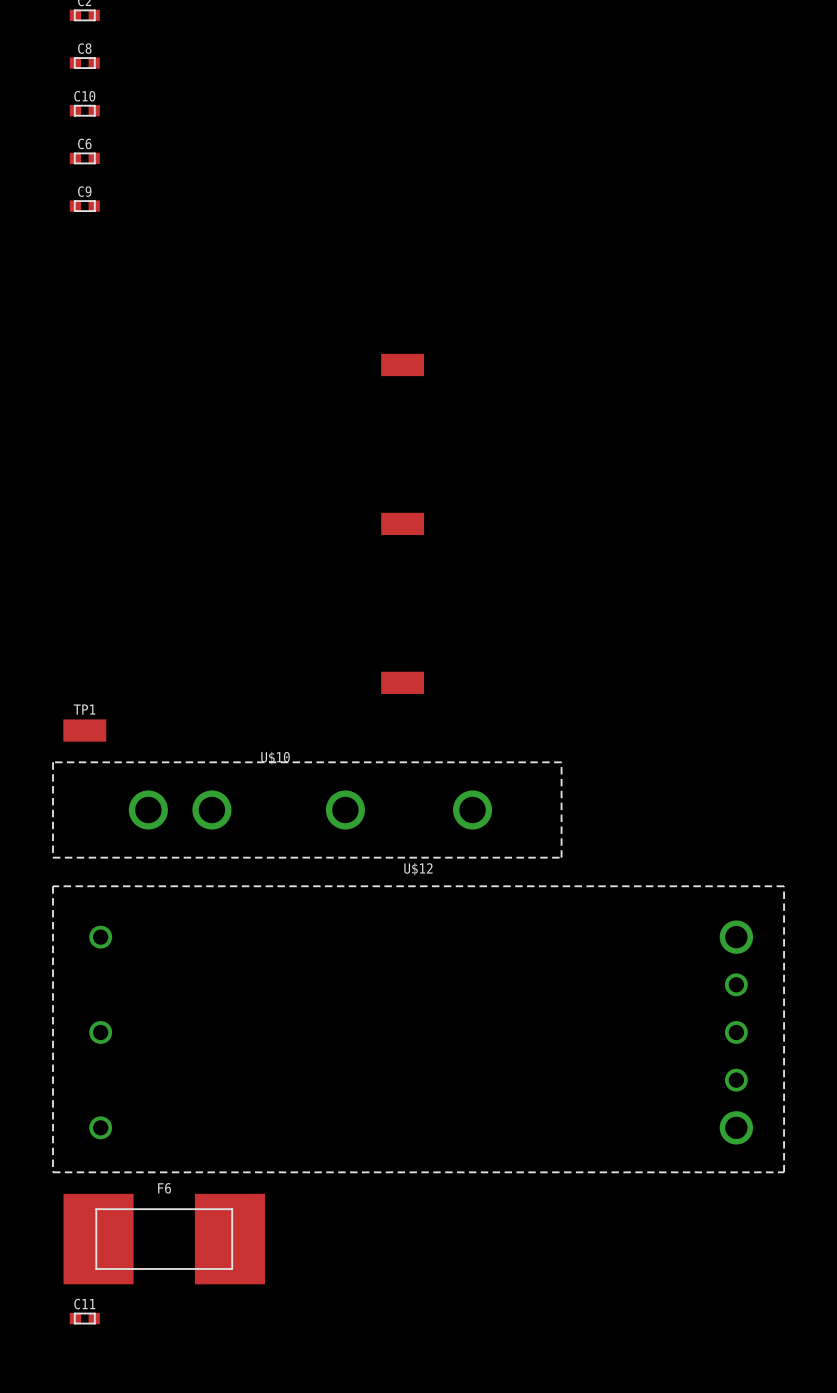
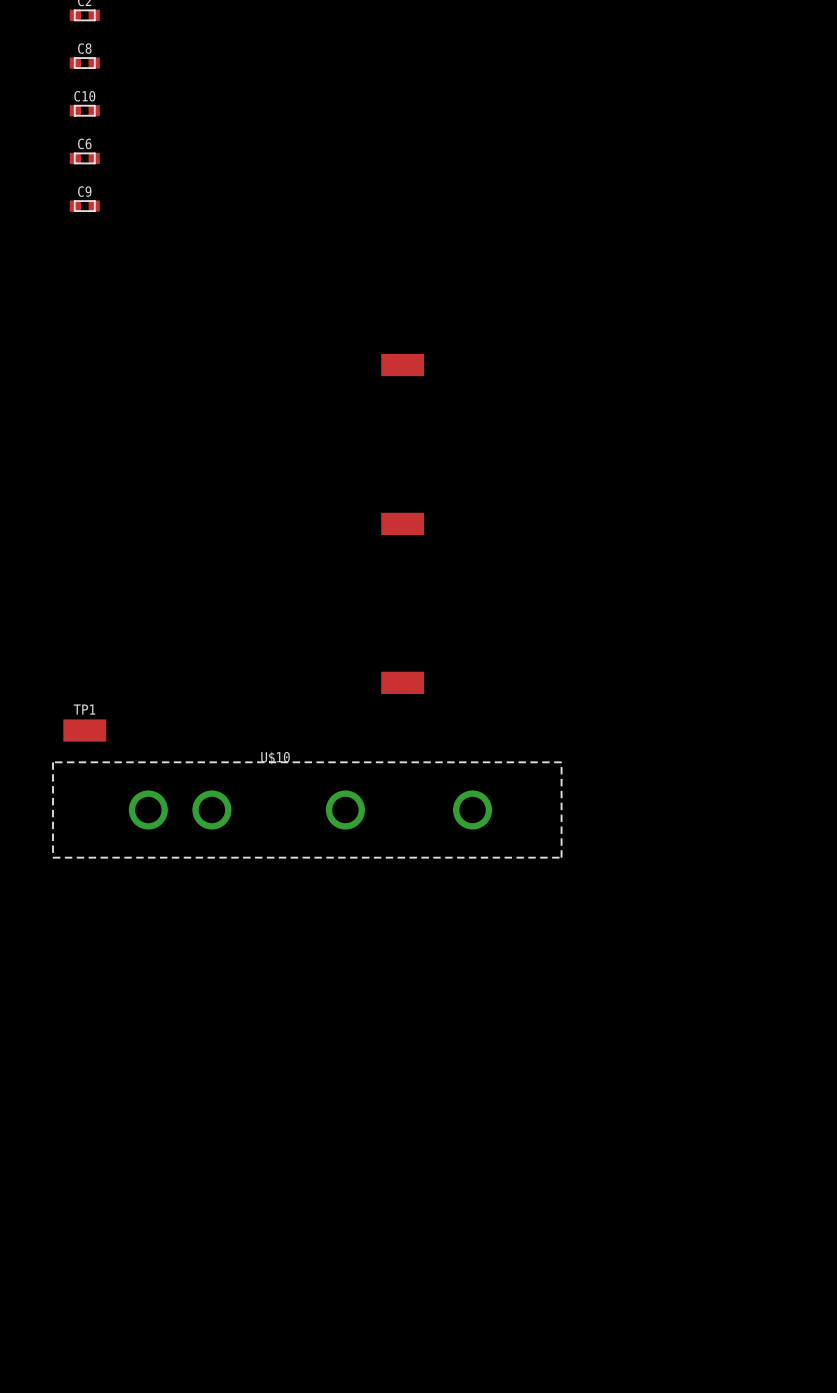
U$12: (418, 1029) -> none
F6: (164, 1239) -> none
C11: (84, 1318) -> none

